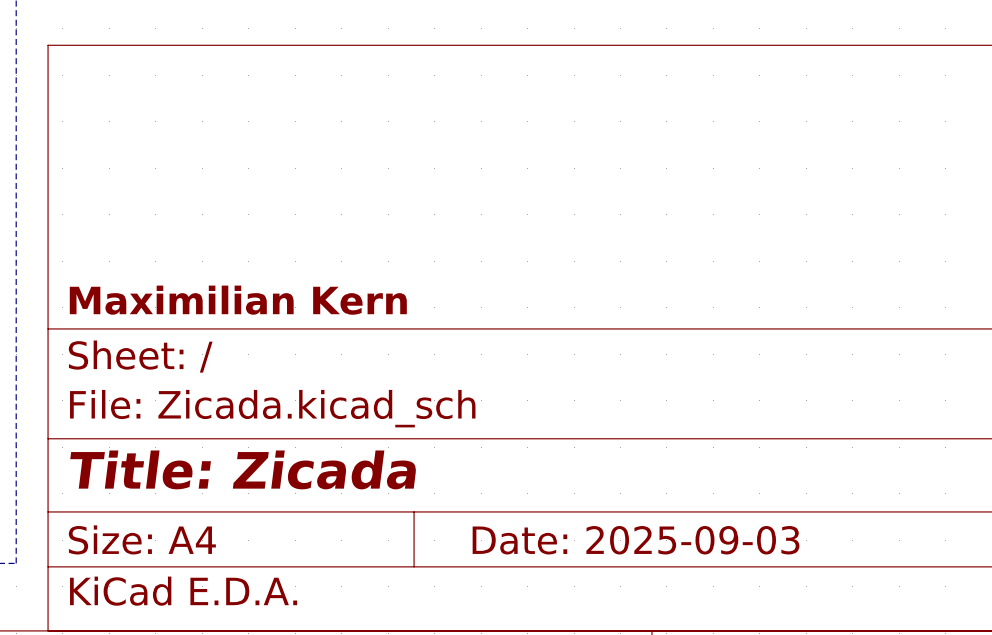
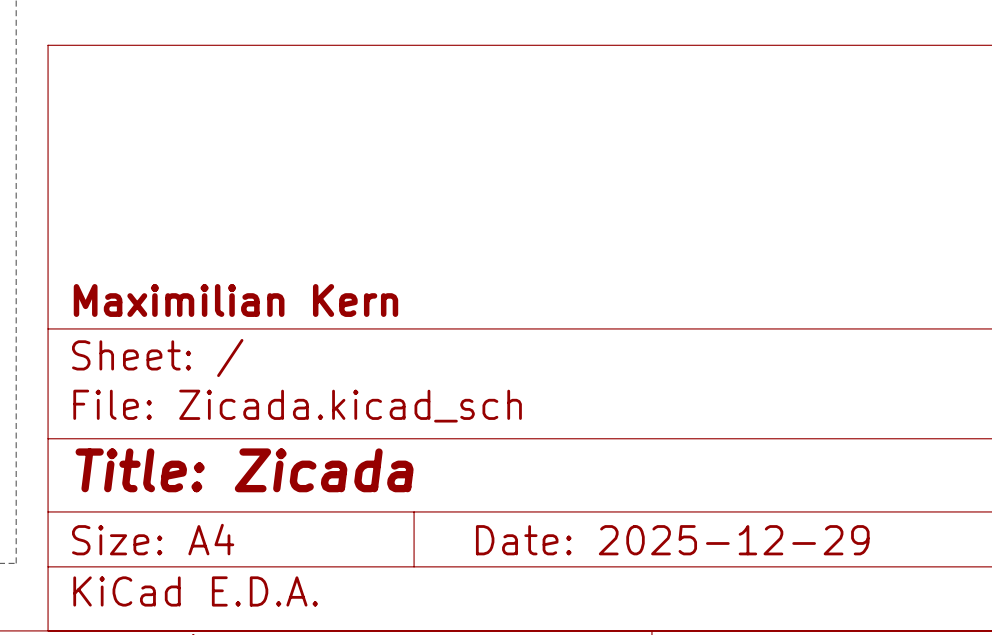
title block: Date: 2025-09-03 (636, 540) -> Date: 2025-12-29 (672, 540)

